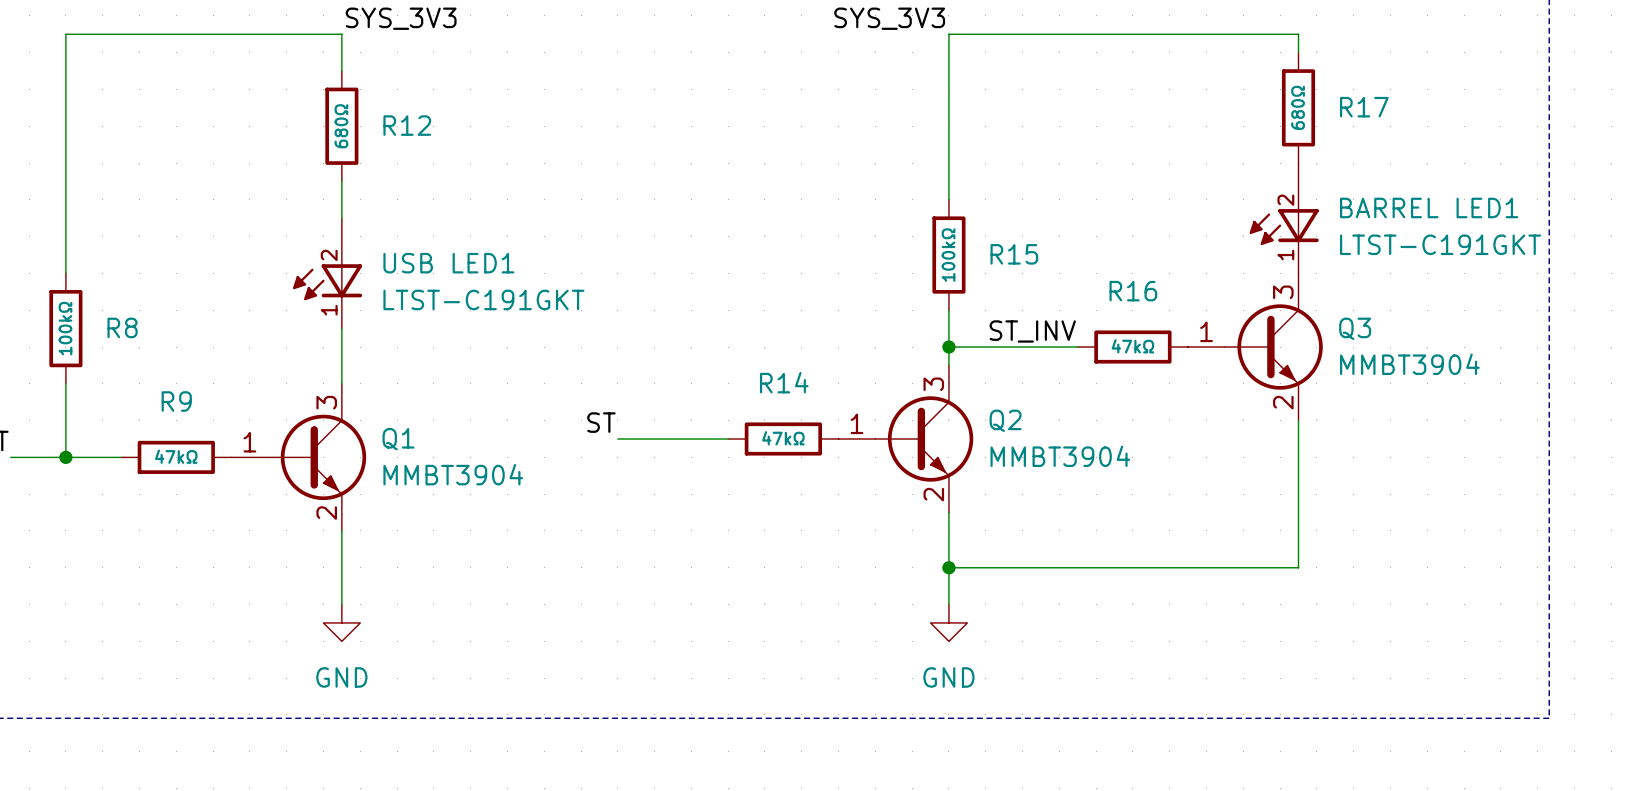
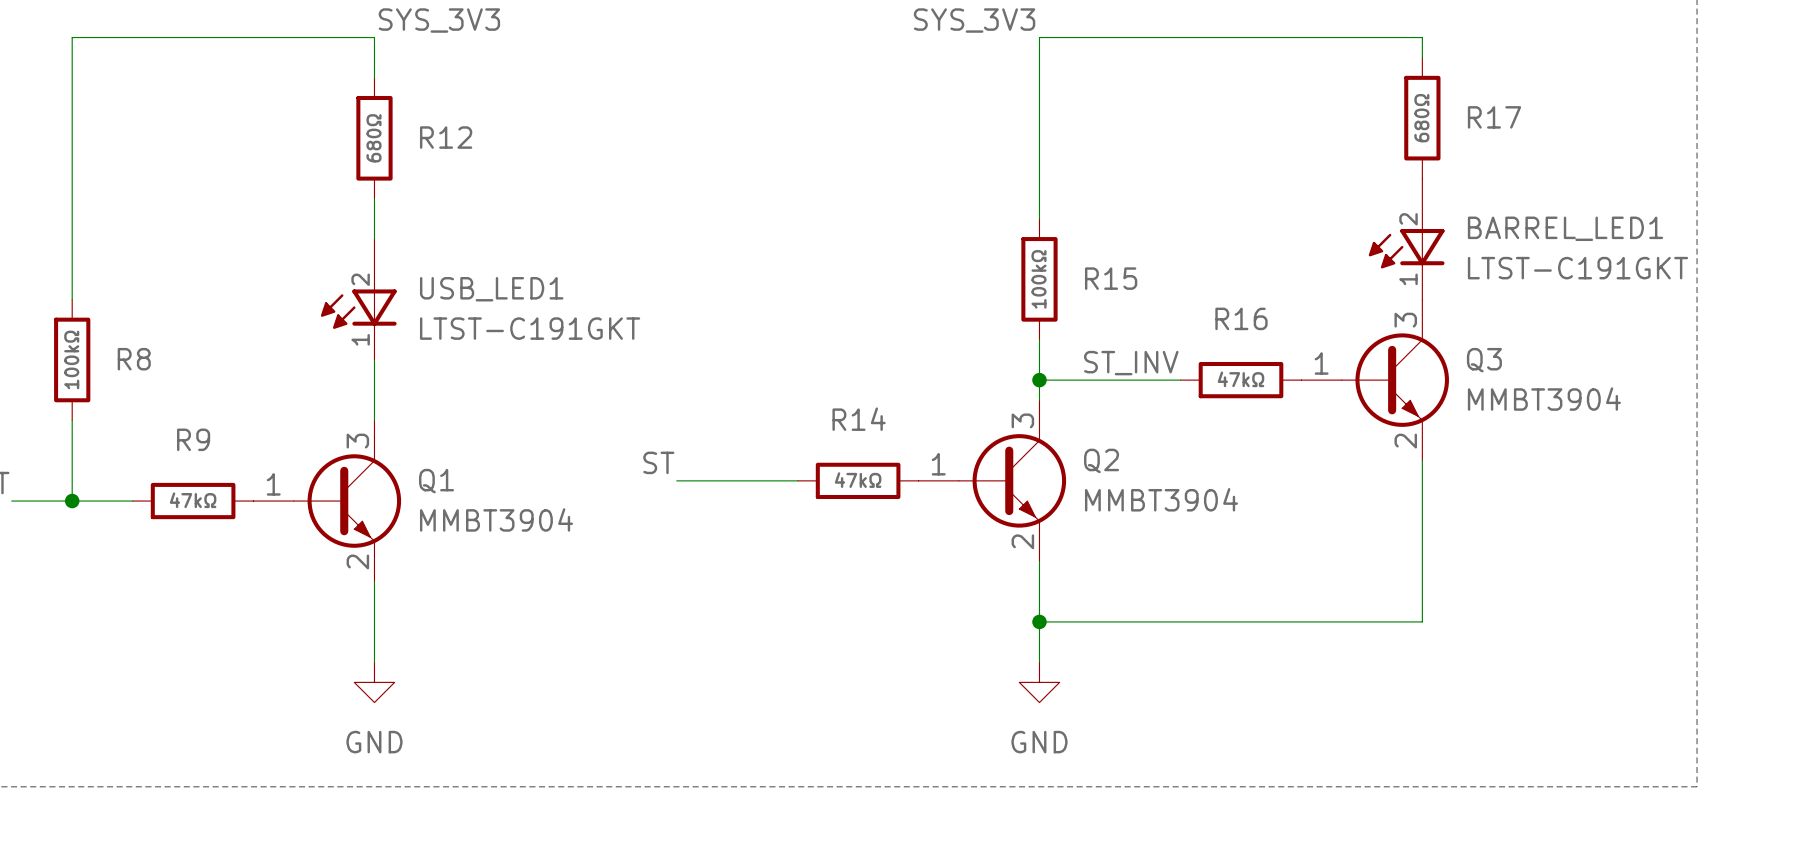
BARREL LED1 name: BARREL LED1 (1429, 207) -> BARREL_LED1 (1565, 228)
USB LED1 name: USB LED1 (448, 263) -> USB_LED1 (491, 289)

